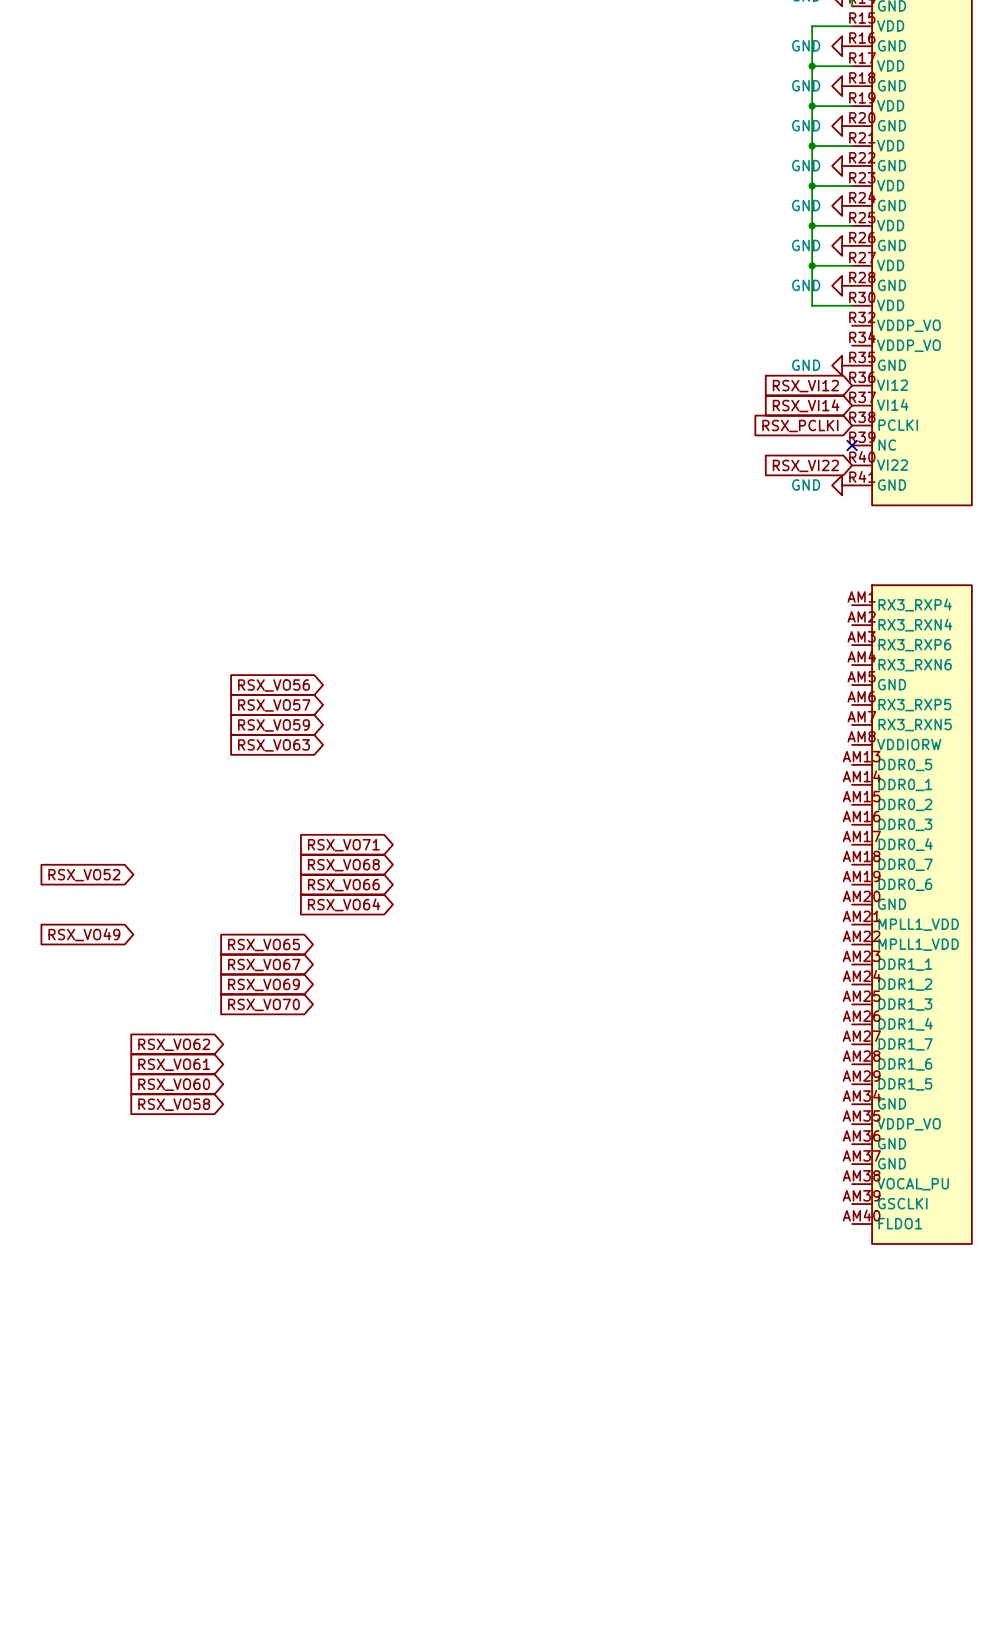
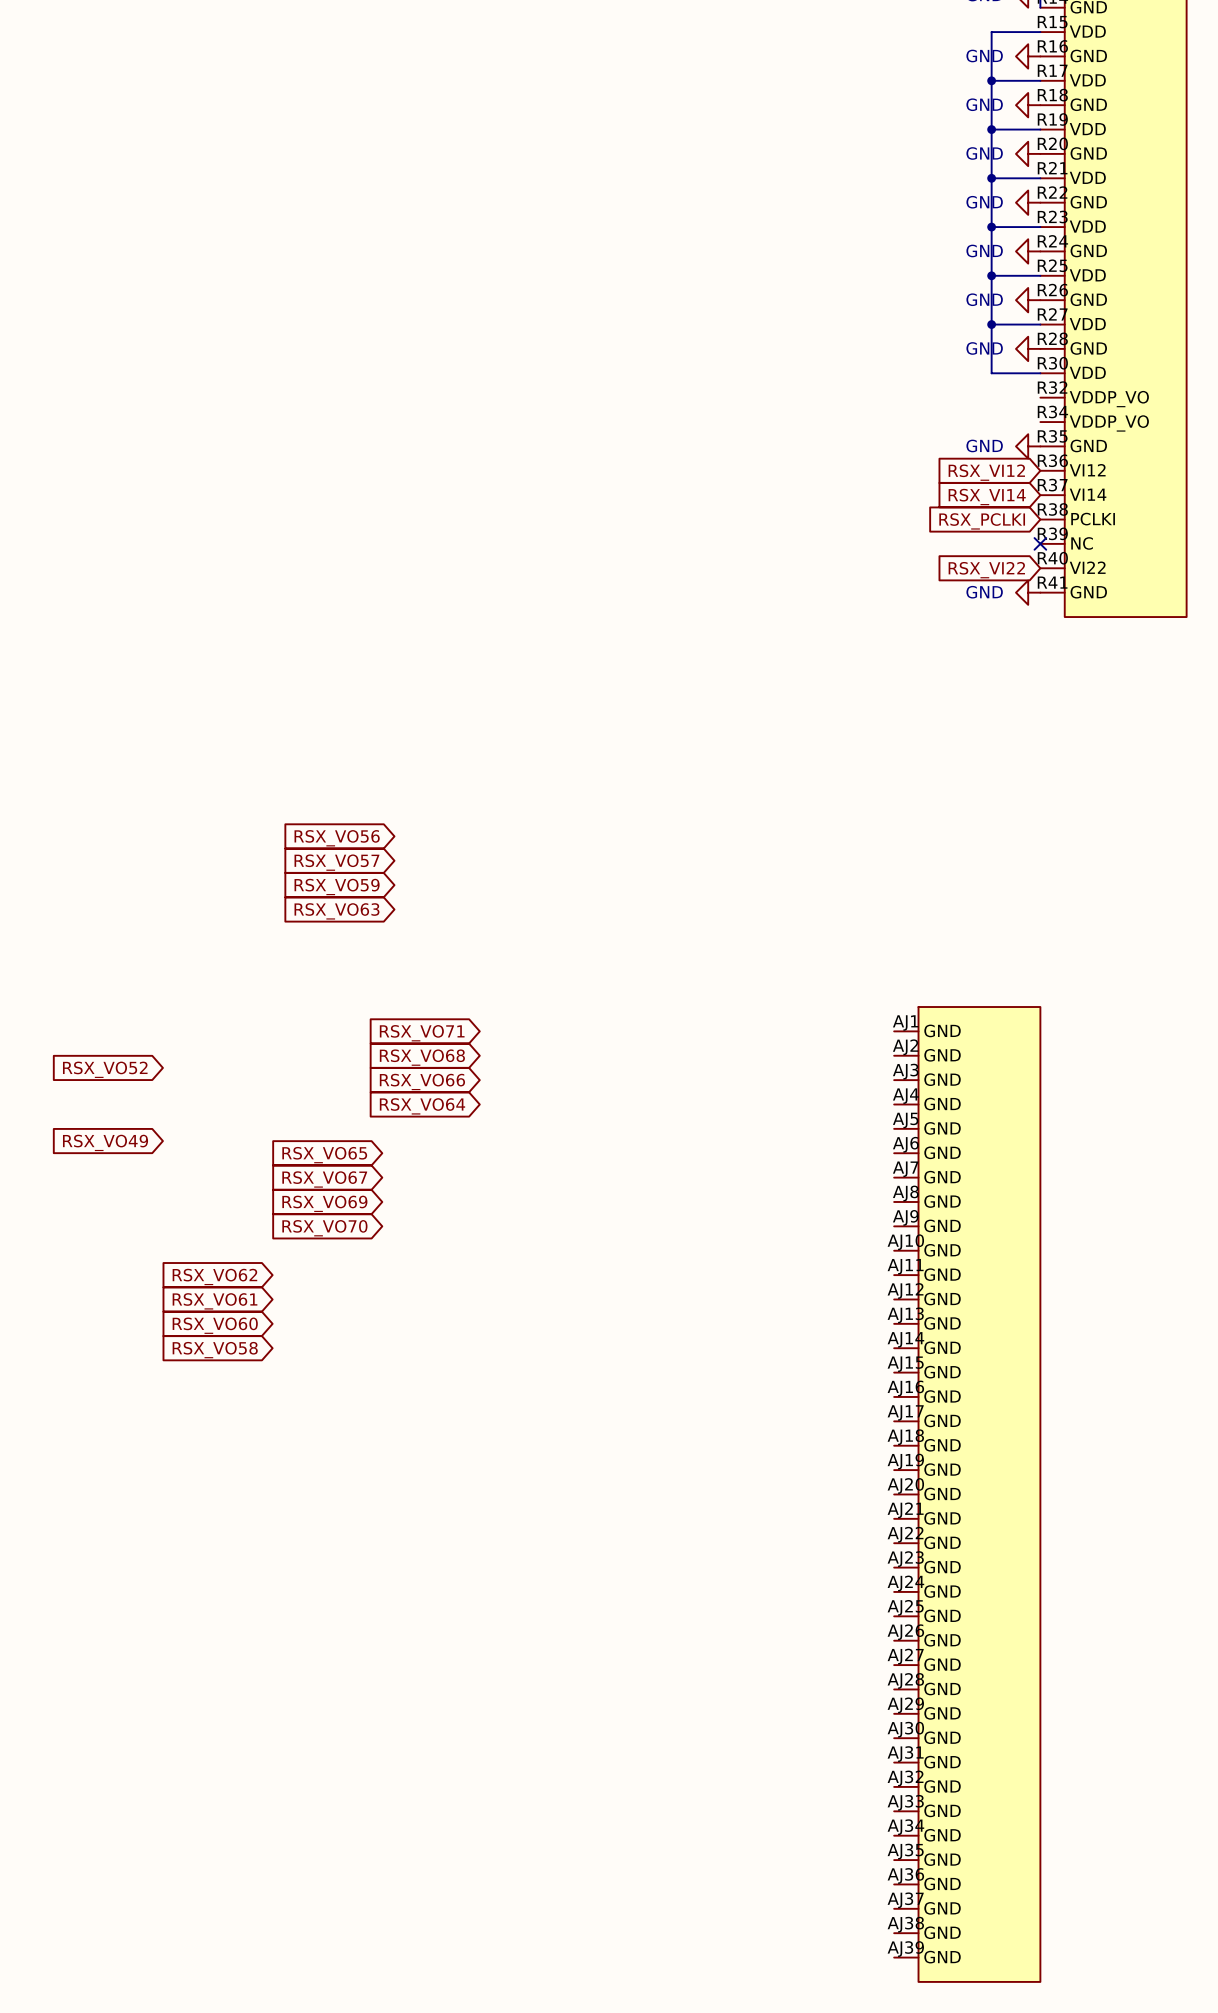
part: (911, 914) -> none
part: none -> (967, 1494)

